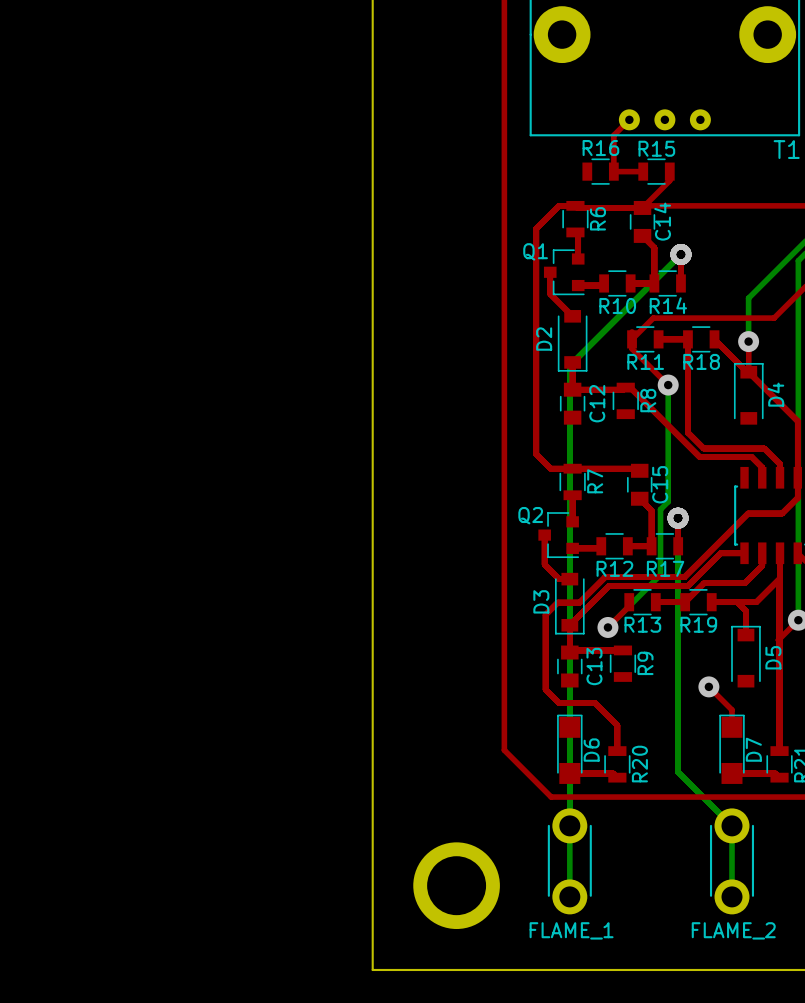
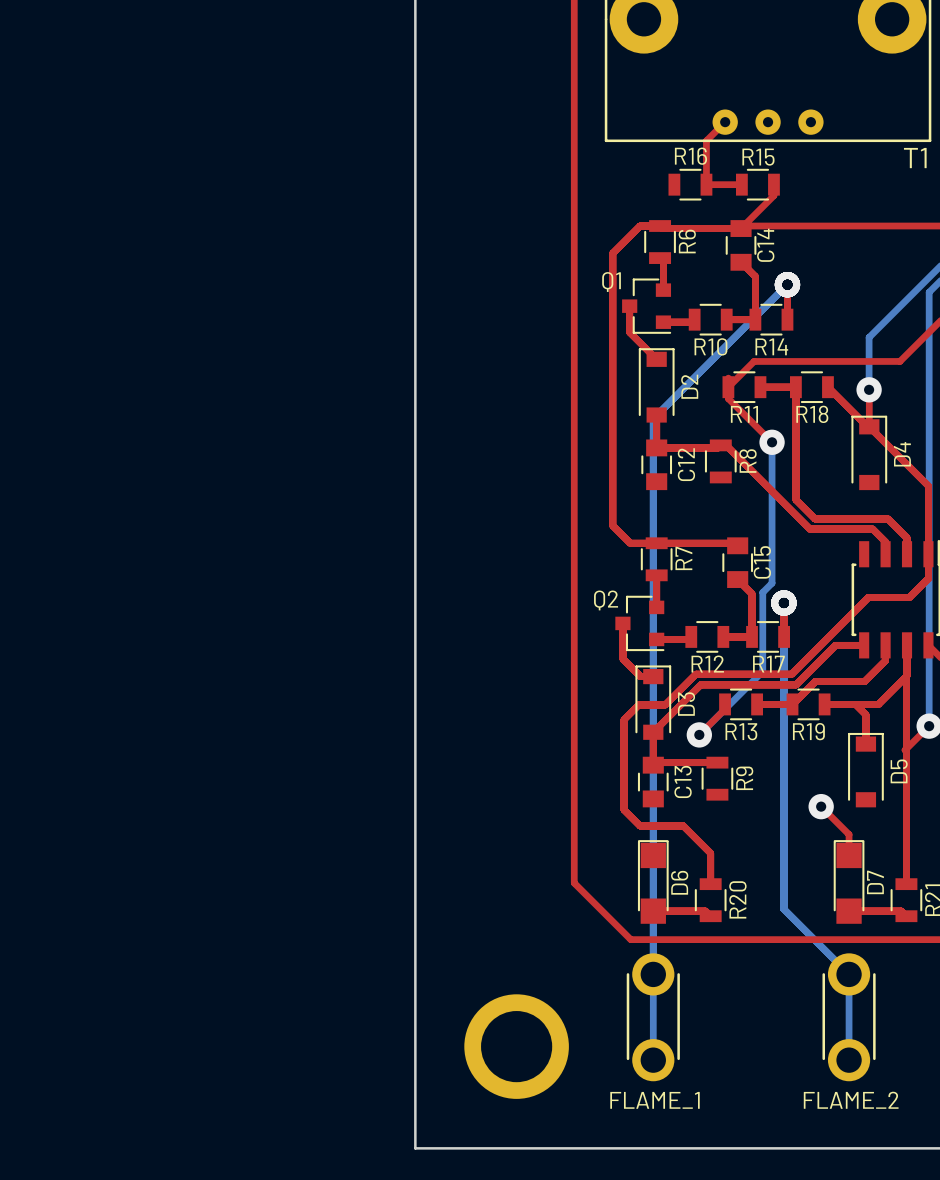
D2 rotation: 0° (572, 340) -> 180° (656, 385)
D3 rotation: 0° (569, 603) -> 180° (653, 702)

